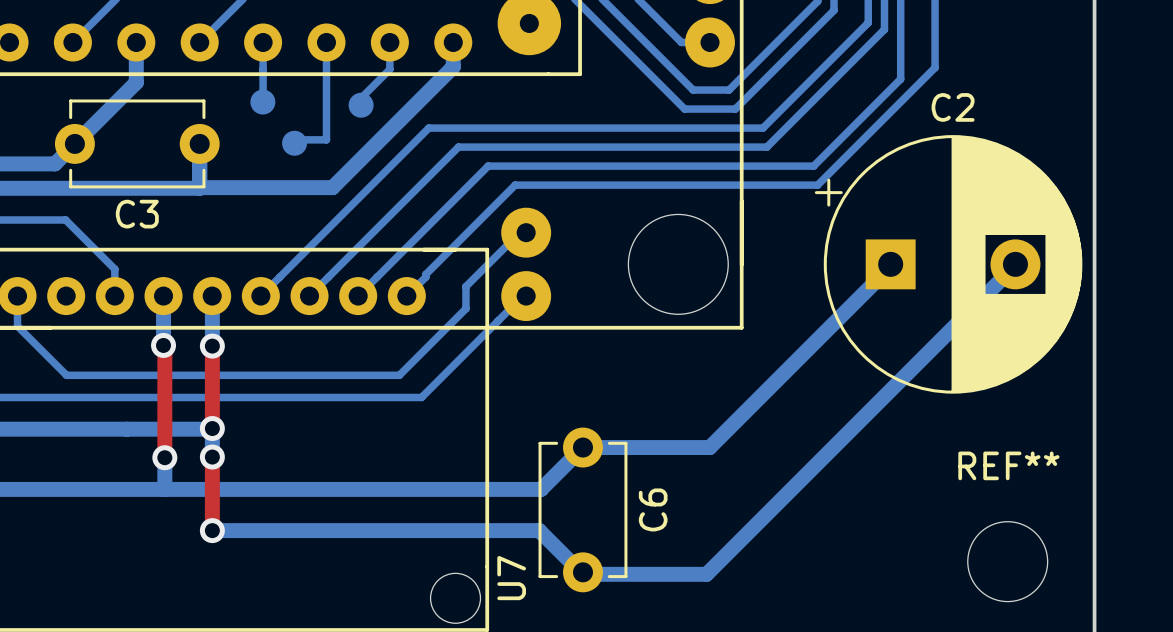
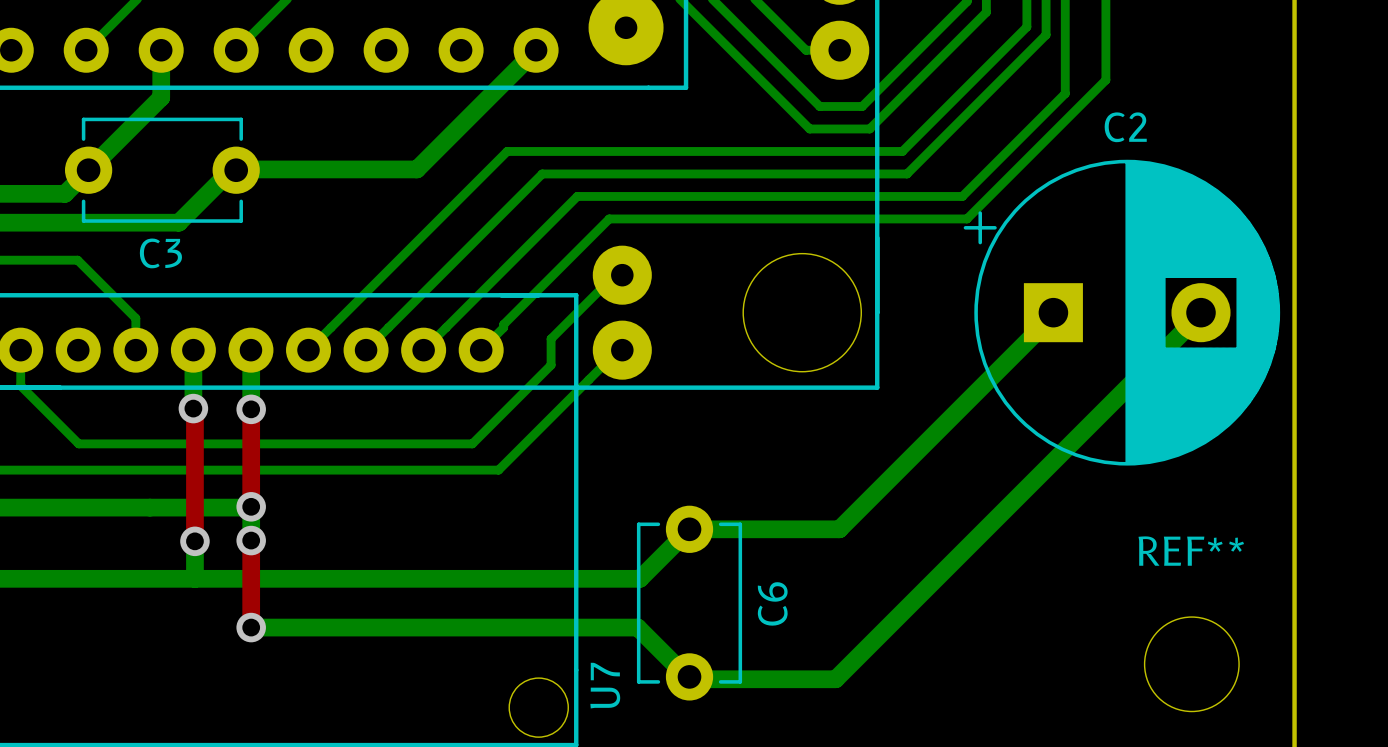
bottom track: (263, 42) (263, 98) -> none
bottom track: (326, 42) (326, 139) (288, 139) -> none
bottom track: (389, 42) (389, 69) (361, 98) -> none
bottom track: (453, 42) (453, 66) (332, 187) (199, 187) -> (536, 50) (416, 169) (231, 170) (178, 222)
part: (262, 102) -> none
part: (361, 105) -> none
bottom track: (199, 143) (199, 188) (151, 188) -> none
part: (294, 143) -> none

